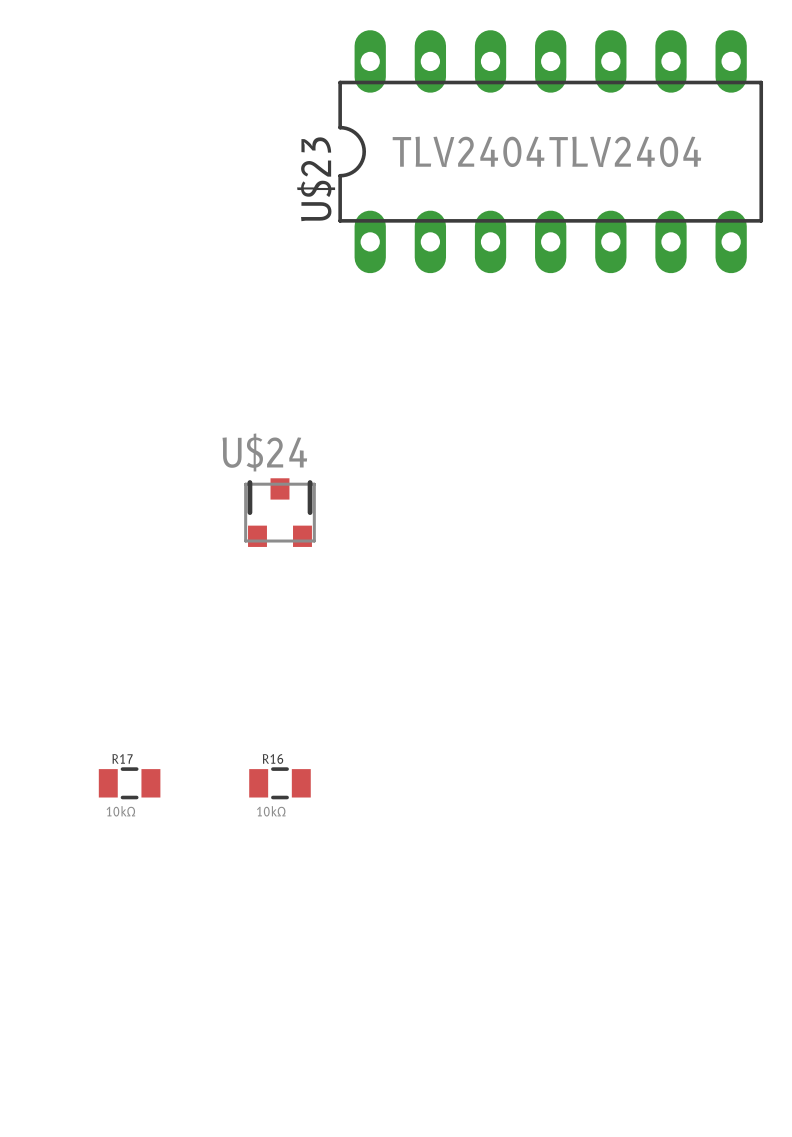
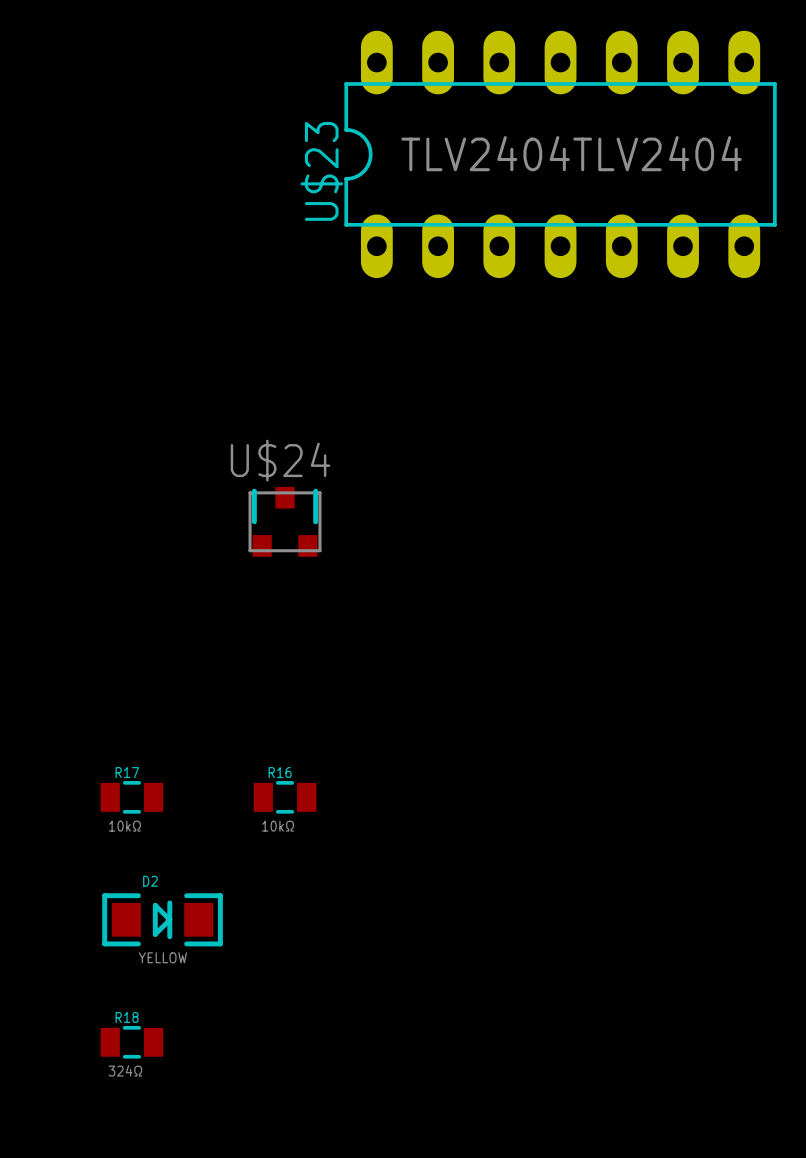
D2: none -> YELLOW (162, 919)
R18: none -> 324Ω (131, 1042)

